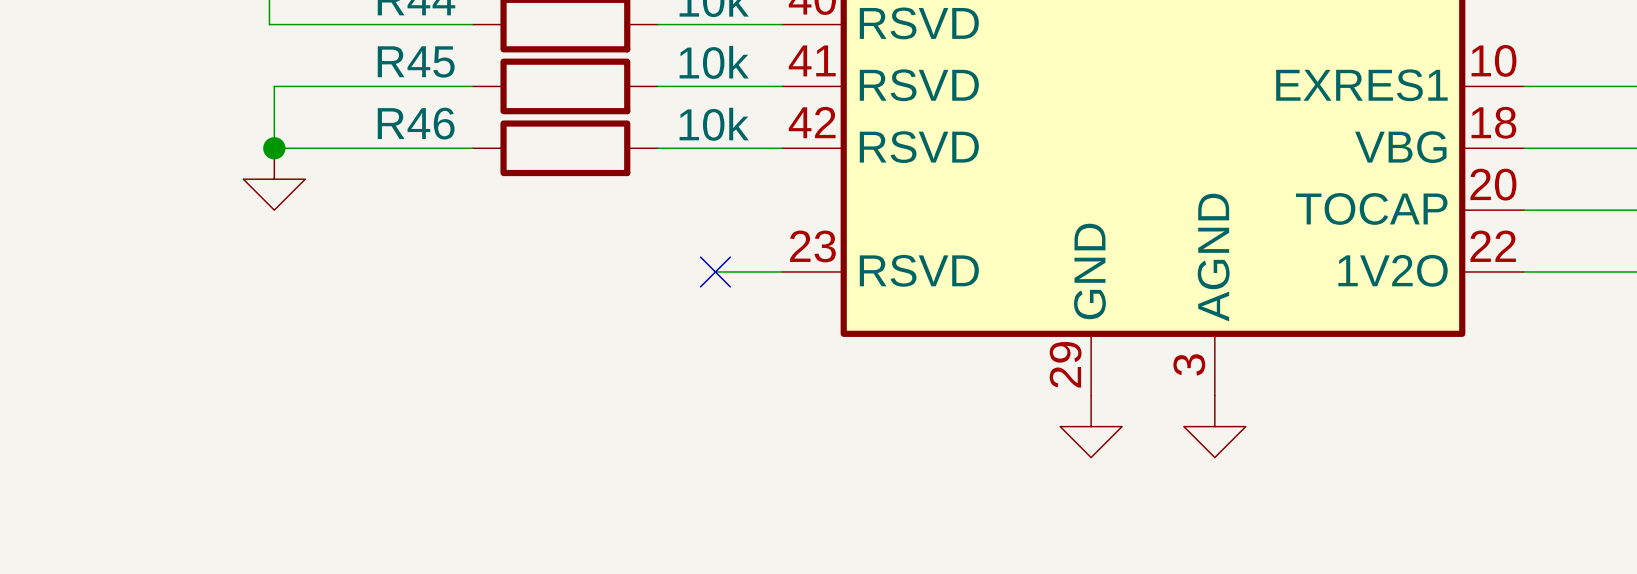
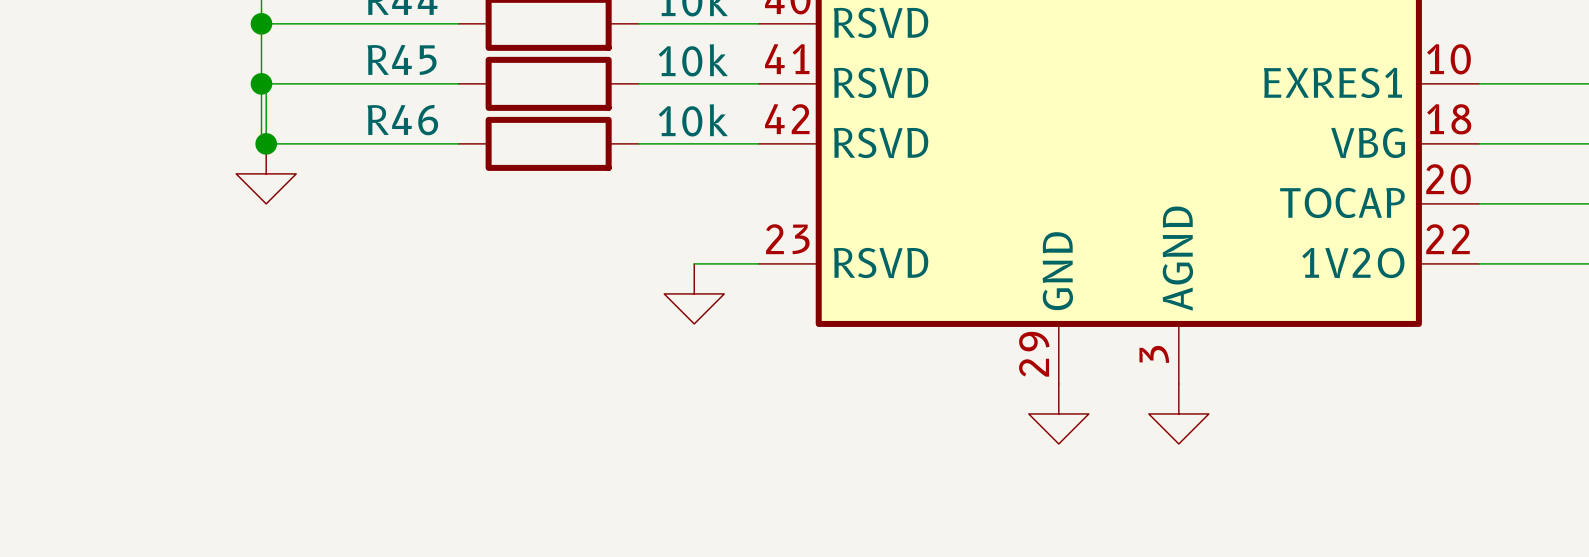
wire: none -> (261, 23) (261, 143) (266, 143)
junction: none -> (261, 23)
junction: none -> (261, 83)
no-connect mark: (715, 271) -> none
power symbol: none -> (694, 293)

